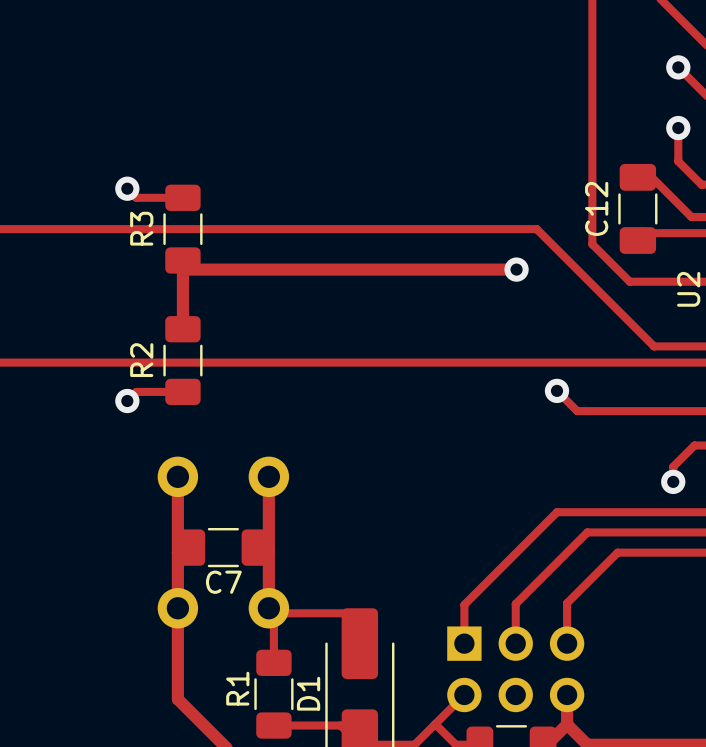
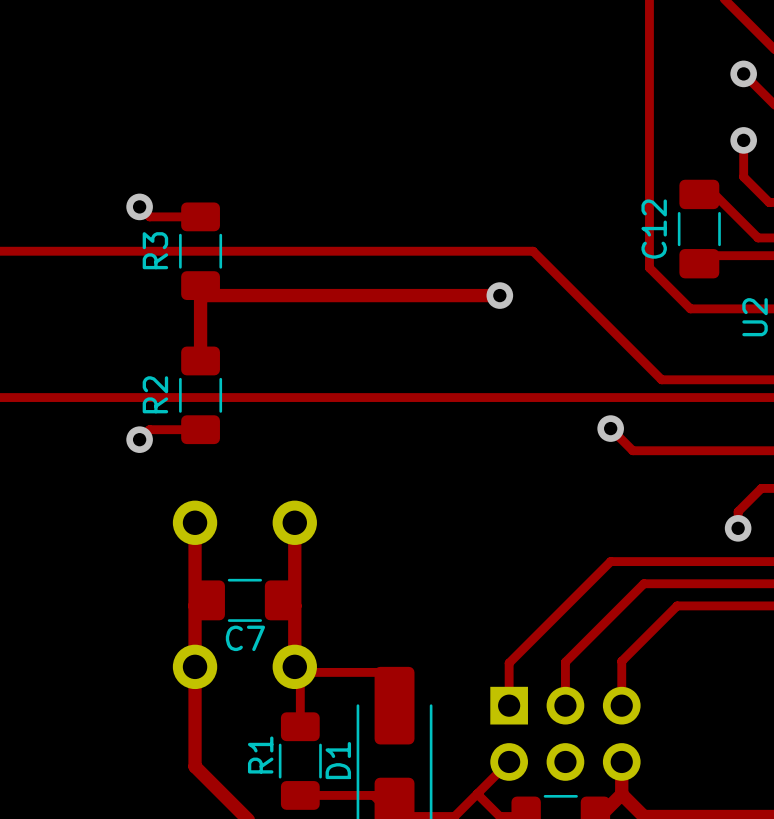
track: (486, 229) (536, 229) (654, 346) -> (533, 251) (661, 379) (717, 379)
track: (455, 269) (516, 269) -> none
via position: (516, 269) -> (499, 295)

